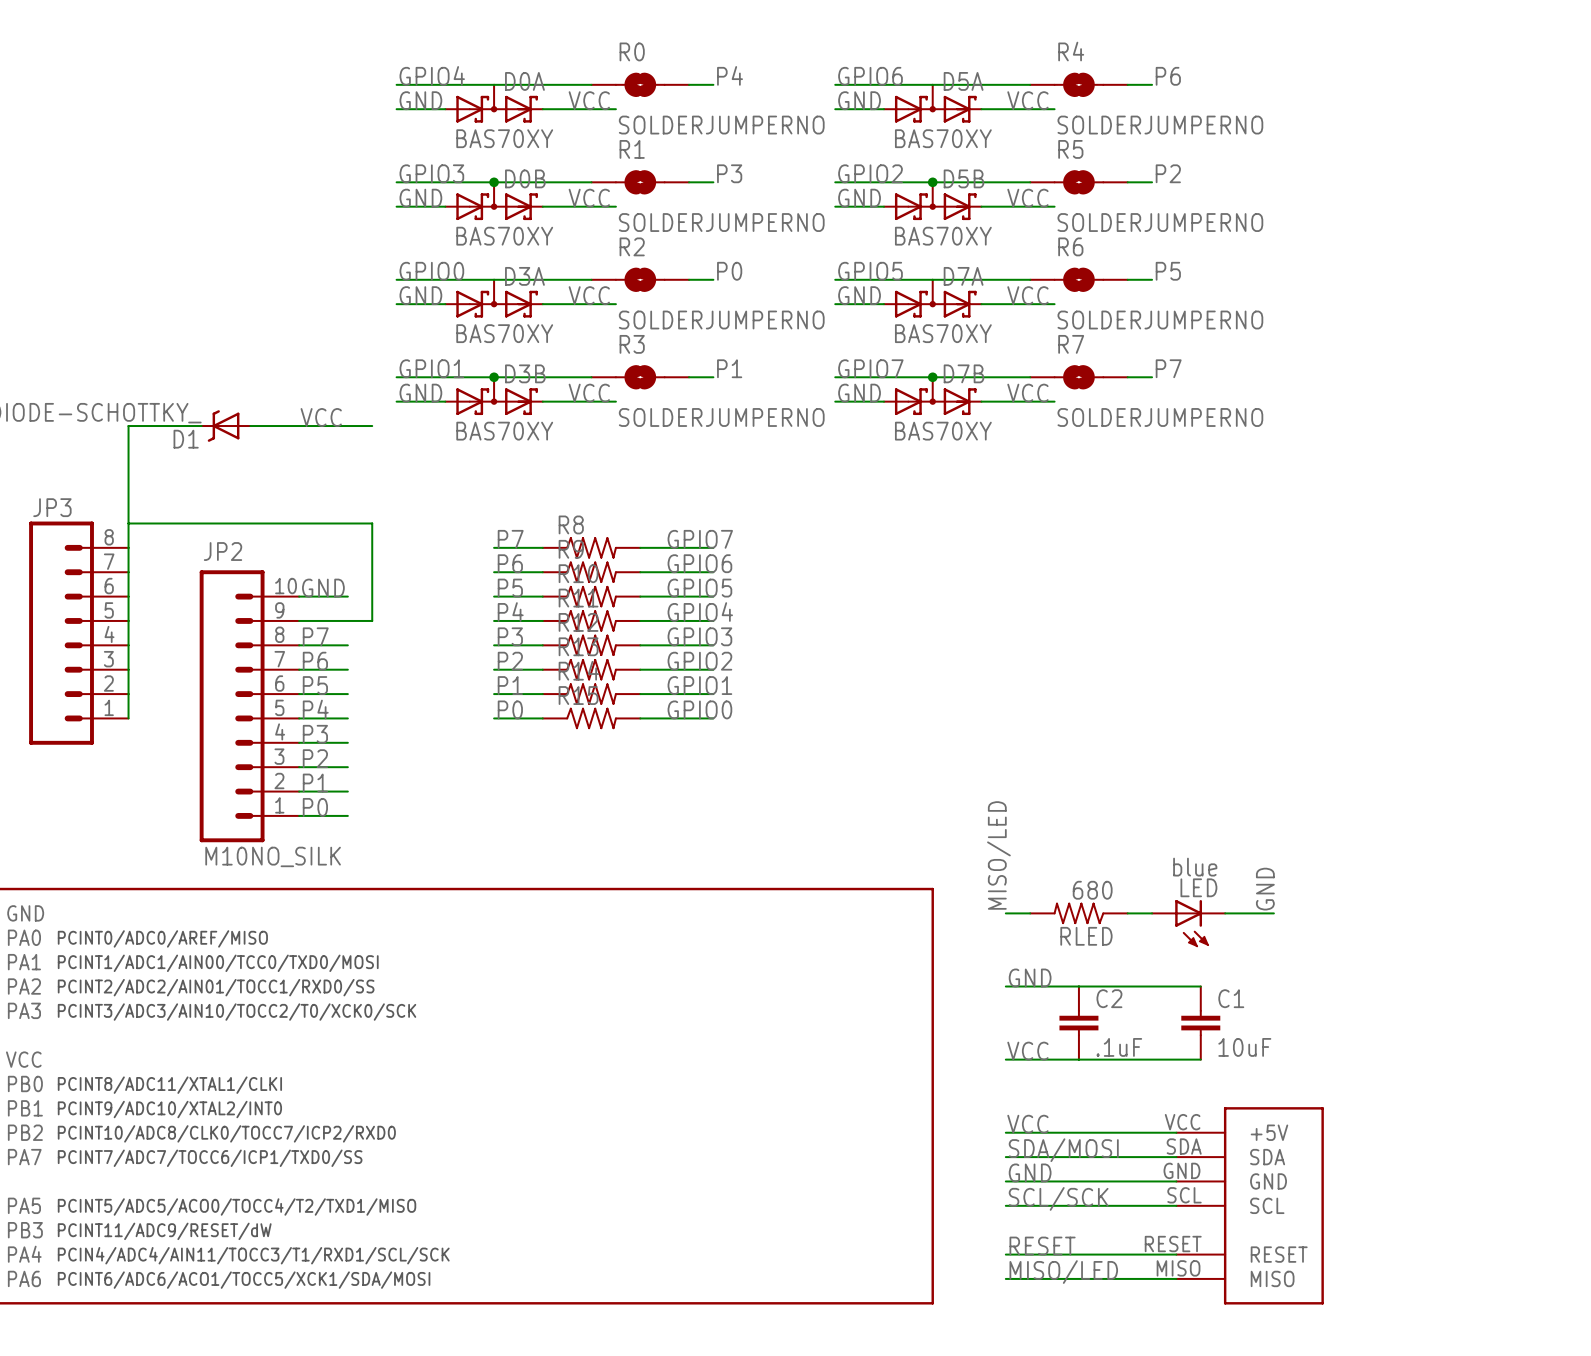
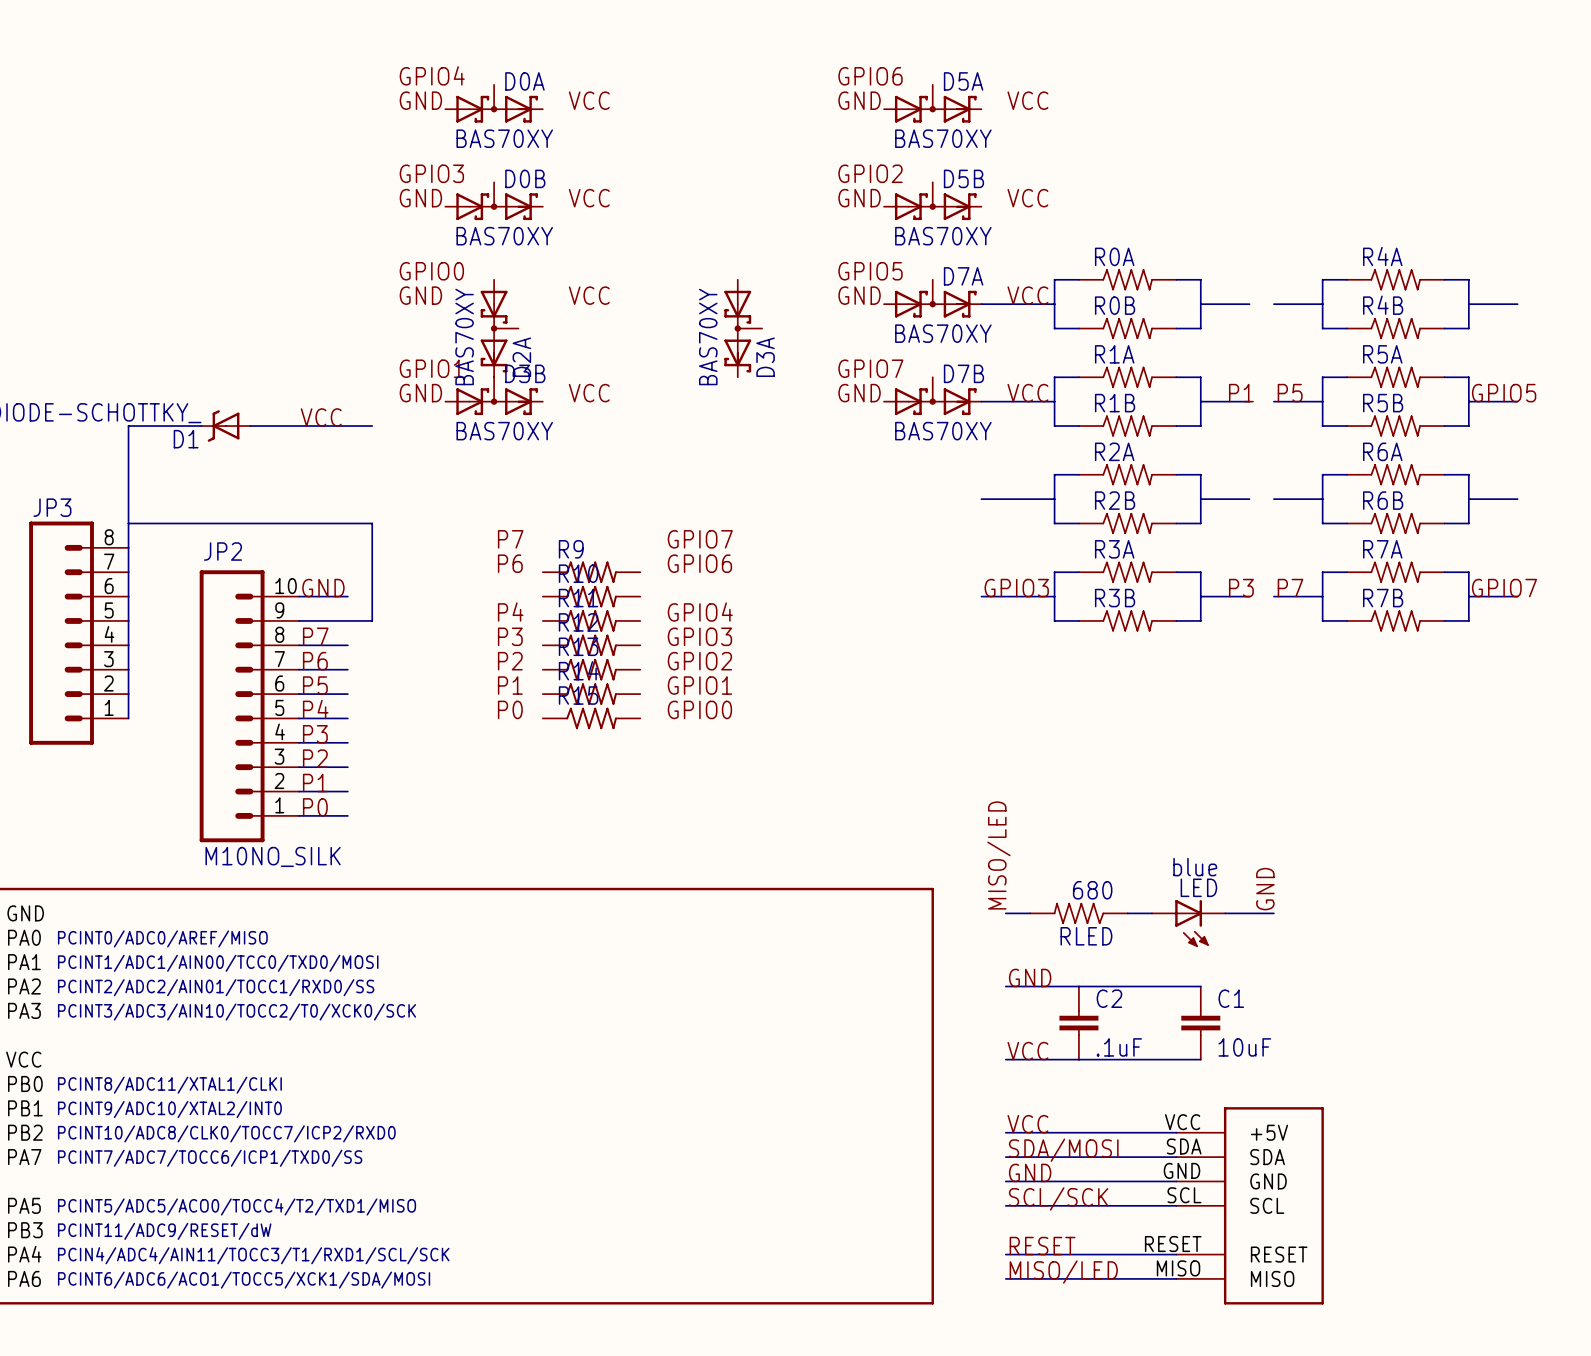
label: P4 (730, 75) -> none
label: P6 (1168, 76) -> none
wire: (396, 84) (591, 84) -> none
R0: SOLDERJUMPERNO (640, 84) -> none
wire: (689, 84) (713, 84) -> none
wire: (835, 84) (1030, 84) -> none
R4: SOLDERJUMPERNO (1078, 84) -> none
wire: (1127, 84) (1152, 84) -> none
wire: (396, 109) (445, 109) -> none
wire: (542, 109) (615, 109) -> none
wire: (835, 109) (883, 109) -> none
wire: (981, 109) (1054, 109) -> none
label: P3 (729, 173) -> none
label: P2 (1168, 173) -> none
wire: (396, 182) (591, 182) -> none
junction: (494, 182) -> none
R1: SOLDERJUMPERNO (640, 182) -> none
wire: (689, 182) (713, 182) -> none
wire: (835, 182) (1030, 182) -> none
junction: (932, 182) -> none
R5: SOLDERJUMPERNO (1078, 182) -> none
wire: (1127, 182) (1152, 182) -> none
wire: (396, 206) (445, 206) -> none
wire: (542, 206) (615, 206) -> none
wire: (835, 206) (883, 206) -> none
wire: (981, 206) (1054, 206) -> none
label: P0 (729, 271) -> none
label position: P5 (1168, 271) -> P5 (1290, 393)
wire: (396, 279) (591, 279) -> none
R2: SOLDERJUMPERNO (640, 279) -> none
wire: (689, 279) (713, 279) -> none
wire: (835, 279) (1030, 279) -> none
wire: none -> (1078, 279) (1054, 279) (1054, 328) (1078, 328)
R6: SOLDERJUMPERNO (1078, 279) -> none
wire: (1127, 279) (1152, 279) -> none
R0A: none -> (1127, 279)
wire: none -> (1176, 279) (1200, 279) (1200, 328) (1176, 328)
wire: none -> (1347, 279) (1322, 279) (1322, 328) (1347, 328)
R4A: none -> (1395, 279)
wire: none -> (1444, 279) (1468, 279) (1468, 328) (1444, 328)
D3A position: (494, 298) -> (743, 328)
wire: (396, 304) (445, 304) -> none
D3A rotation: 0° (497, 304) -> 90° clockwise (737, 331)
wire: (542, 304) (615, 304) -> none
wire: (835, 304) (883, 304) -> none
wire: none -> (1200, 304) (1249, 304)
wire: none -> (1273, 304) (1322, 304)
wire: none -> (1468, 304) (1517, 304)
D2A: none -> BAS70XY (499, 328)
R0B: none -> (1127, 328)
R4B: none -> (1395, 328)
label: P1 (729, 368) -> none
label: P7 (1168, 368) -> none
wire: (396, 377) (591, 377) -> none
junction: (494, 377) -> none
R3: SOLDERJUMPERNO (640, 377) -> none
wire: (689, 377) (713, 377) -> none
wire: (835, 377) (1030, 377) -> none
junction: (932, 377) -> none
wire: none -> (1078, 377) (1054, 377) (1054, 426) (1078, 426)
R7: SOLDERJUMPERNO (1078, 377) -> none
wire: (1127, 377) (1152, 377) -> none
R1A: none -> (1127, 377)
wire: none -> (1176, 377) (1200, 377) (1200, 426) (1176, 426)
wire: none -> (1347, 377) (1322, 377) (1322, 426) (1347, 426)
R5A: none -> (1395, 377)
wire: none -> (1444, 377) (1468, 377) (1468, 426) (1444, 426)
label: none -> P1 (1241, 393)
label: none -> GPIO5 (1504, 393)
wire: (396, 401) (445, 401) -> none
wire: (542, 401) (615, 401) -> none
wire: (835, 401) (883, 401) -> none
wire: none -> (1200, 401) (1249, 401)
wire: none -> (1273, 401) (1322, 401)
wire: none -> (1468, 401) (1517, 401)
R1B: none -> (1127, 426)
R5B: none -> (1395, 426)
wire: none -> (1078, 474) (1054, 474) (1054, 523) (1078, 523)
R2A: none -> (1127, 474)
wire: none -> (1176, 474) (1200, 474) (1200, 523) (1176, 523)
wire: none -> (1347, 474) (1322, 474) (1322, 523) (1347, 523)
R6A: none -> (1395, 474)
wire: none -> (1444, 474) (1468, 474) (1468, 523) (1444, 523)
wire: none -> (981, 499) (1054, 499)
wire: none -> (1200, 499) (1249, 499)
wire: none -> (1273, 499) (1322, 499)
wire: none -> (1468, 499) (1517, 499)
R2B: none -> (1127, 523)
R6B: none -> (1395, 523)
wire: (494, 547) (542, 547) -> none
R8: (591, 547) -> none
wire: (640, 547) (713, 547) -> none
wire: (494, 572) (542, 572) -> none
wire: (640, 572) (713, 572) -> none
wire: none -> (1078, 572) (1054, 572) (1054, 620) (1078, 620)
R3A: none -> (1127, 572)
wire: none -> (1176, 572) (1200, 572) (1200, 620) (1176, 620)
wire: none -> (1347, 572) (1322, 572) (1322, 620) (1347, 620)
R7A: none -> (1395, 572)
wire: none -> (1444, 572) (1468, 572) (1468, 620) (1444, 620)
label: P5 (510, 588) -> none
label: GPIO5 (699, 588) -> none
label: none -> GPIO3 (1016, 588)
label: none -> P3 (1241, 588)
label: none -> P7 (1290, 588)
label: none -> GPIO7 (1504, 588)
wire: (494, 596) (542, 596) -> none
wire: (640, 596) (713, 596) -> none
wire: none -> (981, 596) (1054, 596)
wire: none -> (1200, 596) (1249, 596)
wire: none -> (1273, 596) (1322, 596)
wire: none -> (1468, 596) (1517, 596)
wire: (494, 620) (542, 620) -> none
wire: (640, 620) (713, 620) -> none
R3B: none -> (1127, 620)
R7B: none -> (1395, 620)
wire: (494, 645) (542, 645) -> none
wire: (640, 645) (713, 645) -> none
wire: (494, 669) (542, 669) -> none
wire: (640, 669) (713, 669) -> none
wire: (494, 694) (542, 694) -> none
wire: (640, 694) (713, 694) -> none
wire: (494, 718) (542, 718) -> none
wire: (640, 718) (713, 718) -> none

